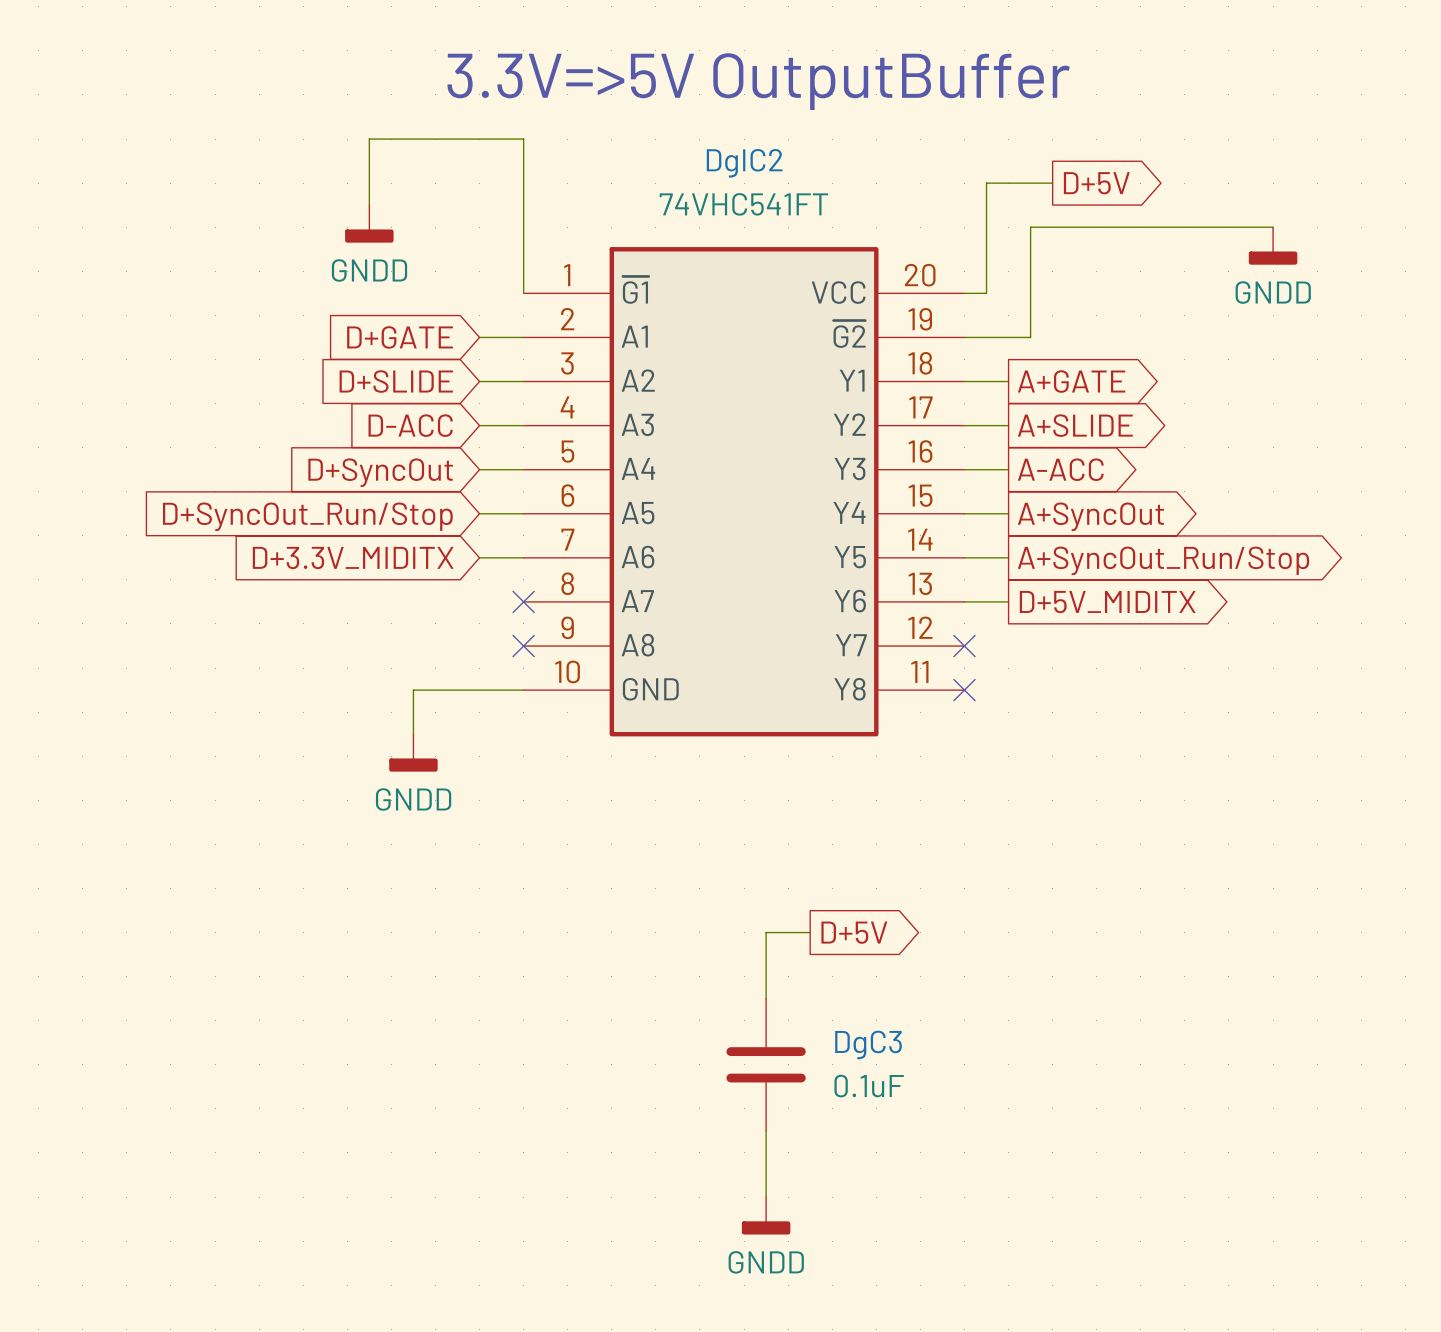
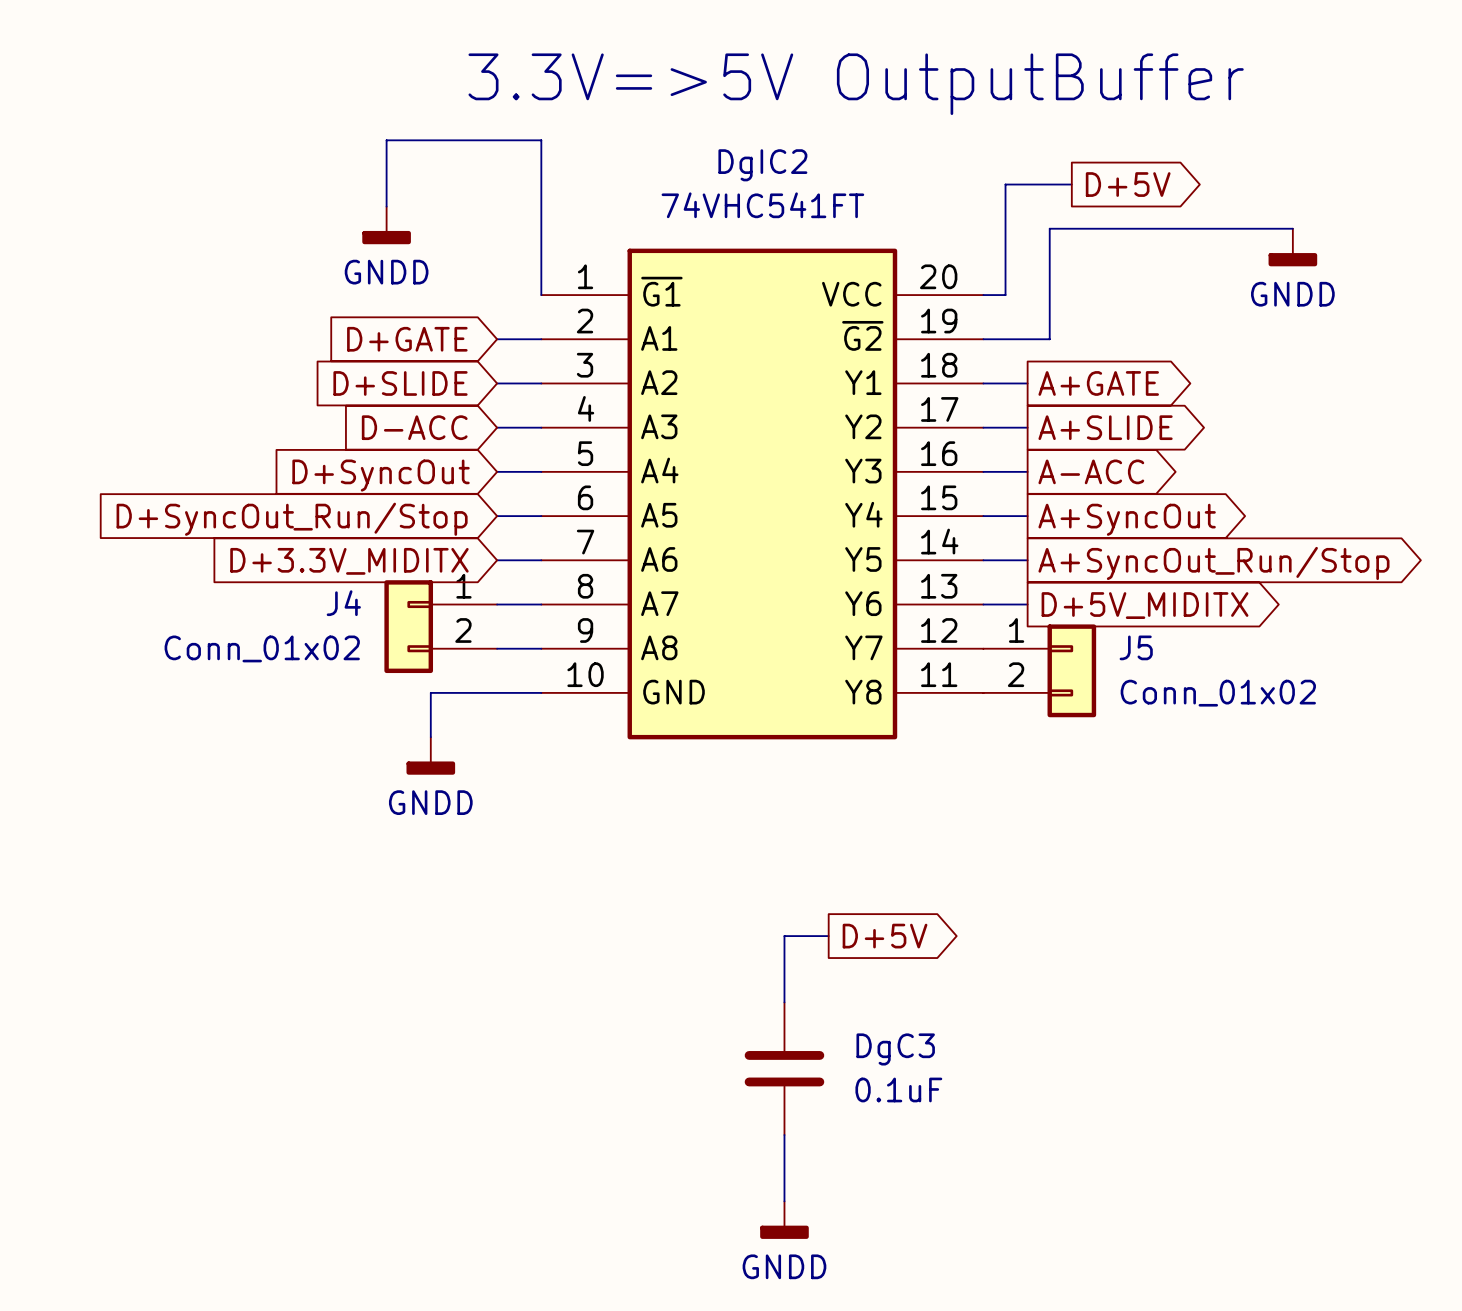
wire: none -> (497, 604) (541, 604)
no-connect mark: (523, 601) -> none
J4: none -> Conn_01x02 (440, 626)
wire: none -> (497, 648) (541, 648)
no-connect mark: (523, 646) -> none
no-connect mark: (964, 646) -> none
J5: none -> Conn_01x02 (1039, 670)
no-connect mark: (964, 690) -> none

